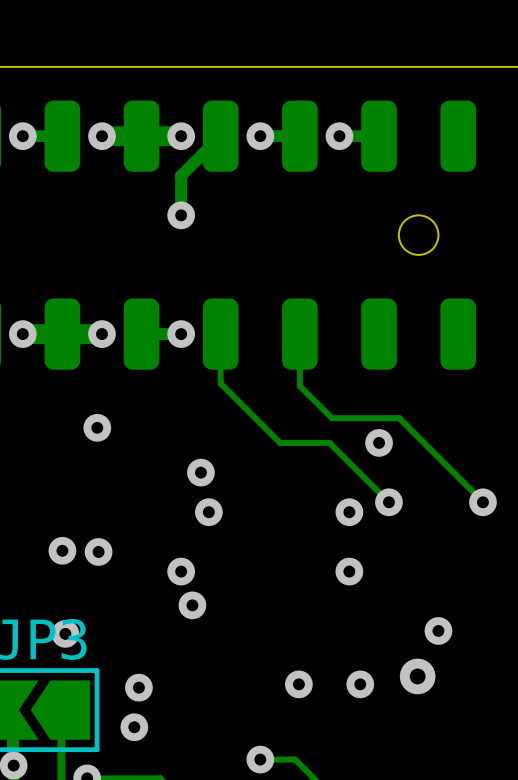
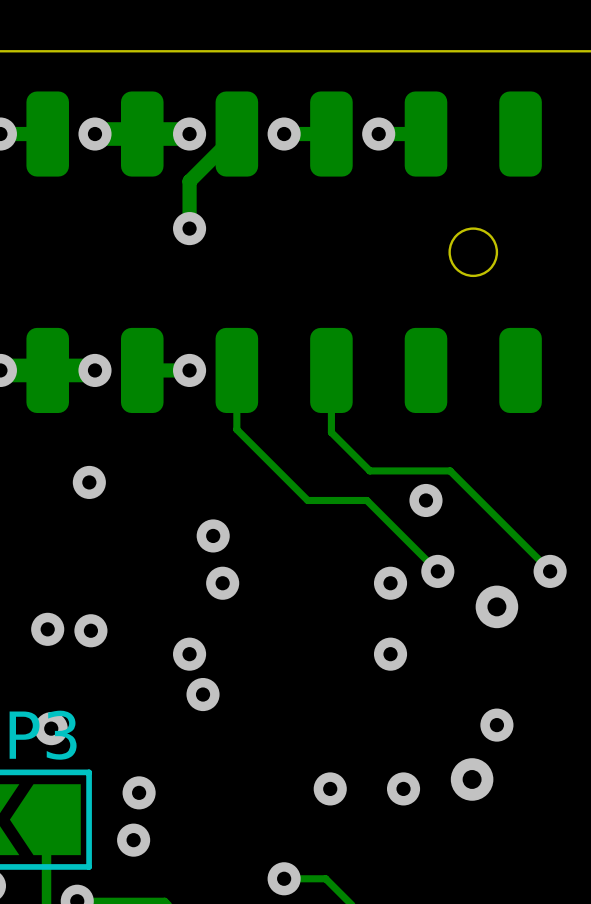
via: none -> (496, 606)

